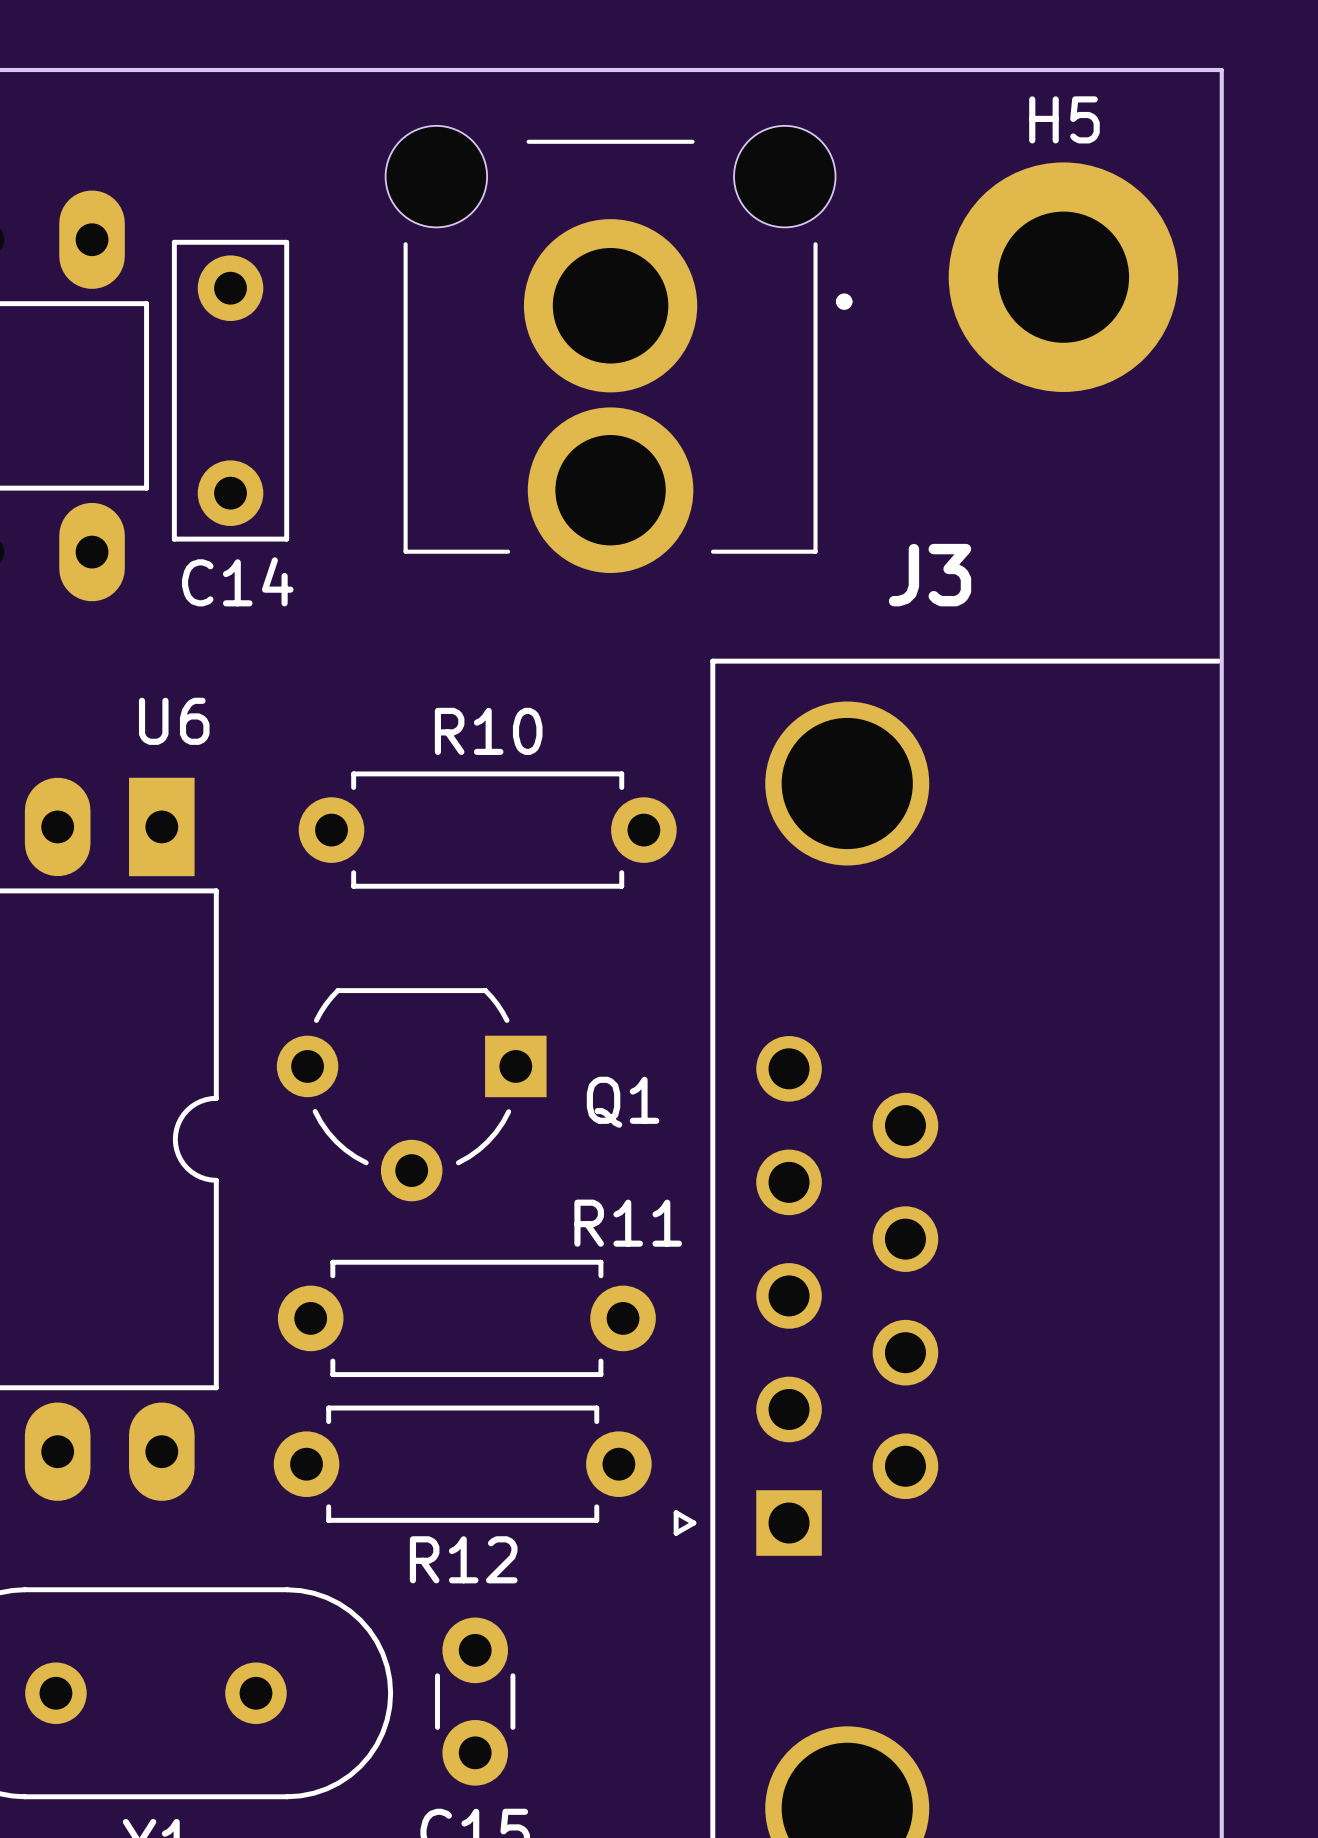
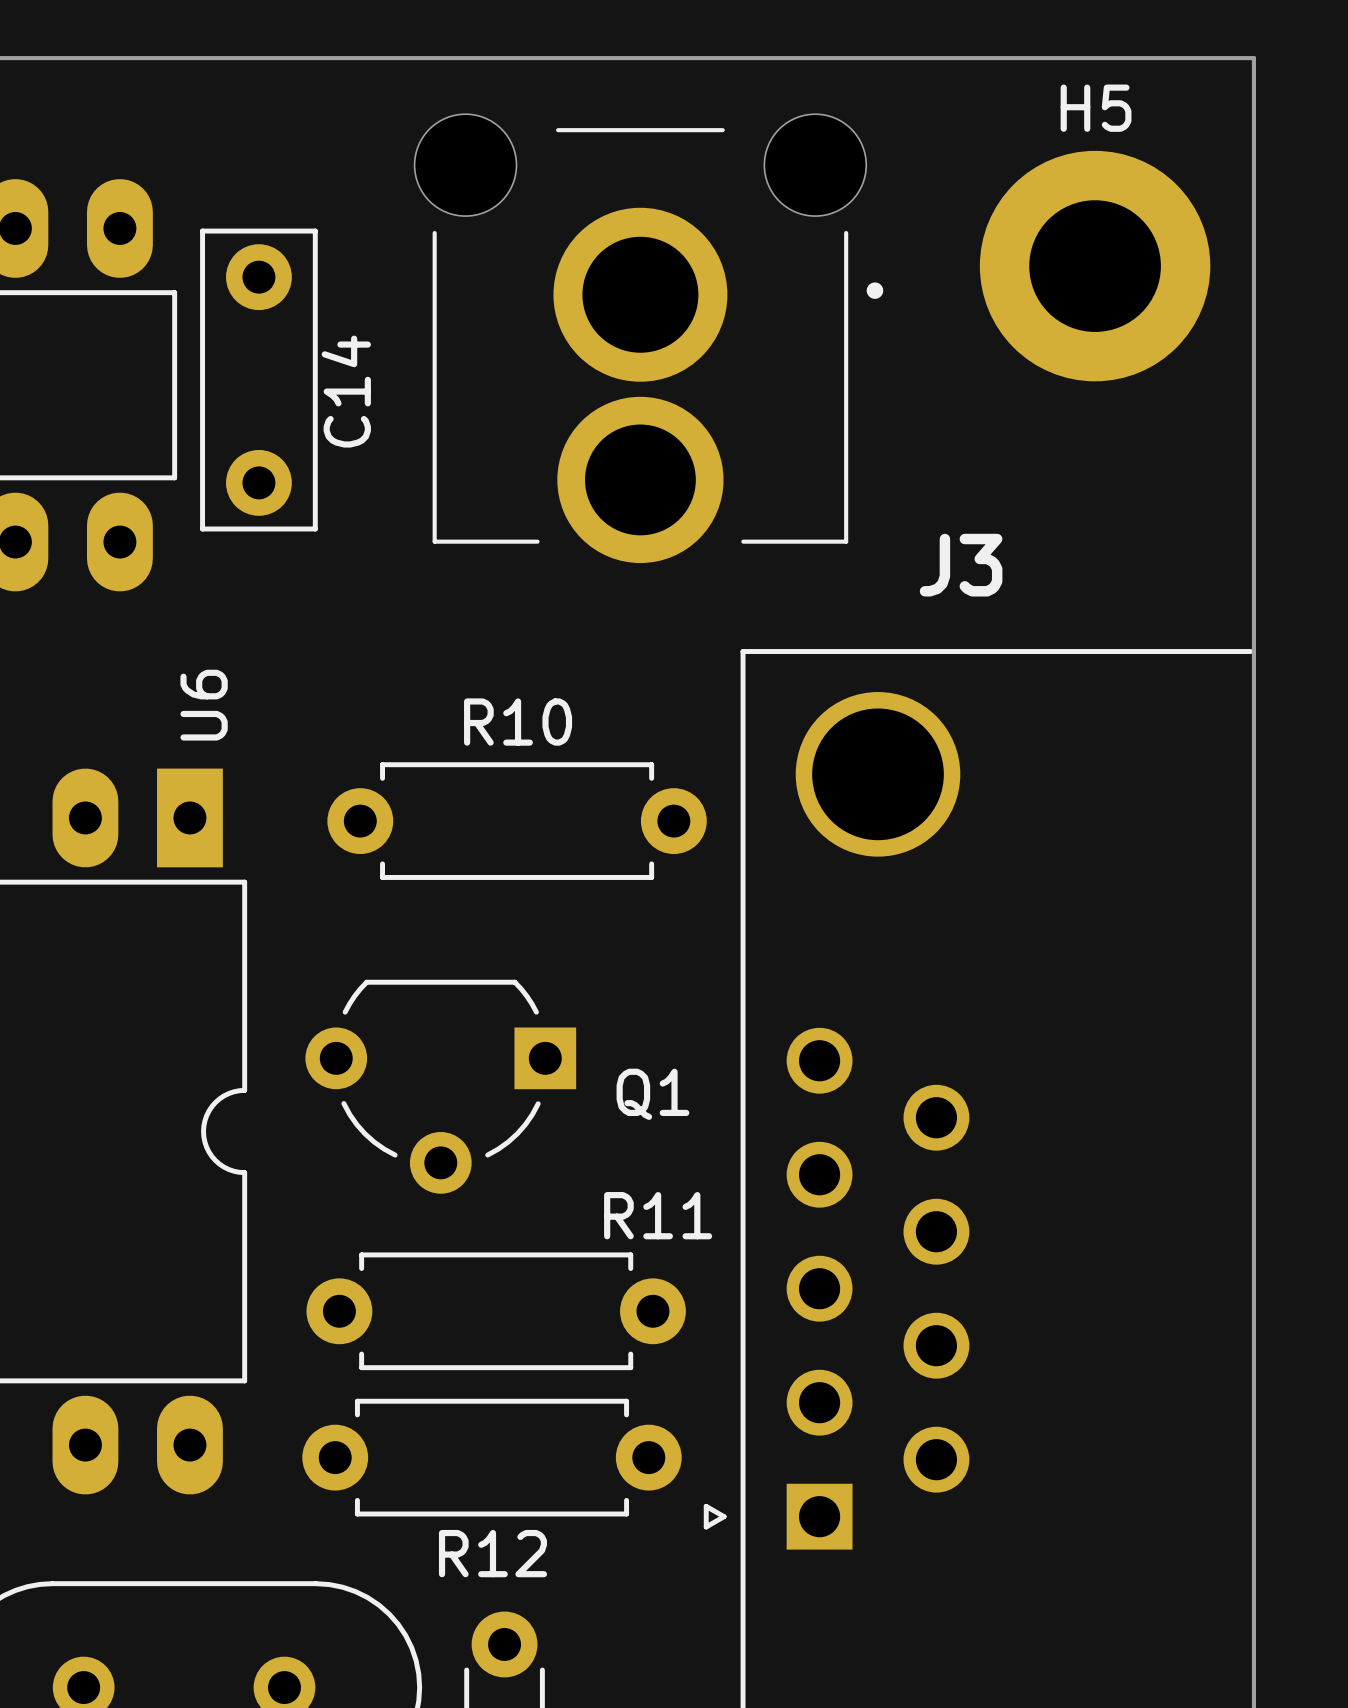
C14 name rotation: 0° (237, 581) -> 90° counterclockwise (346, 391)
C14 name position: C14 (237, 581) -> C14 (346, 391)
U6 name rotation: 0° (174, 721) -> 90° counterclockwise (204, 705)

